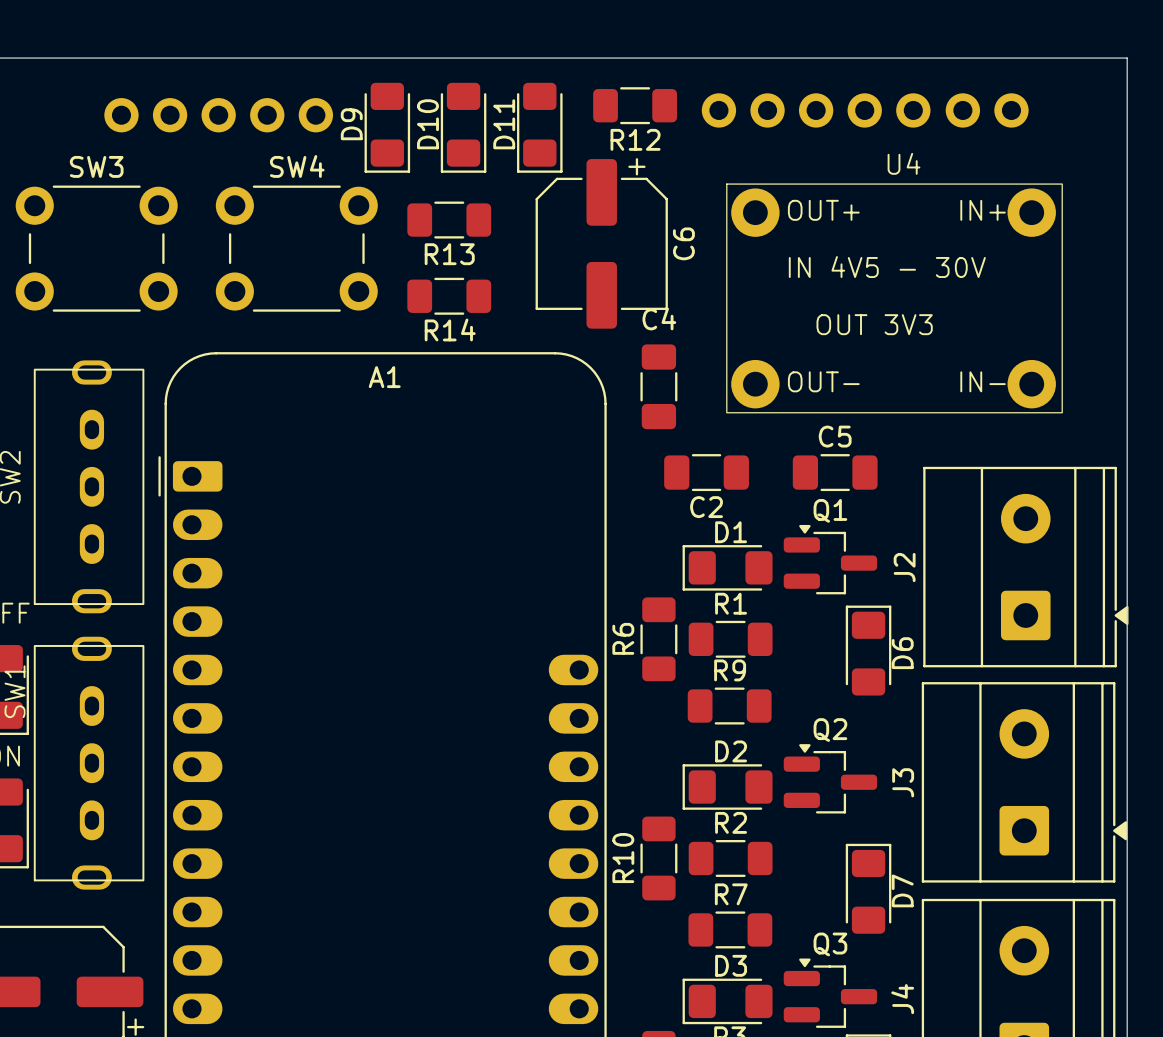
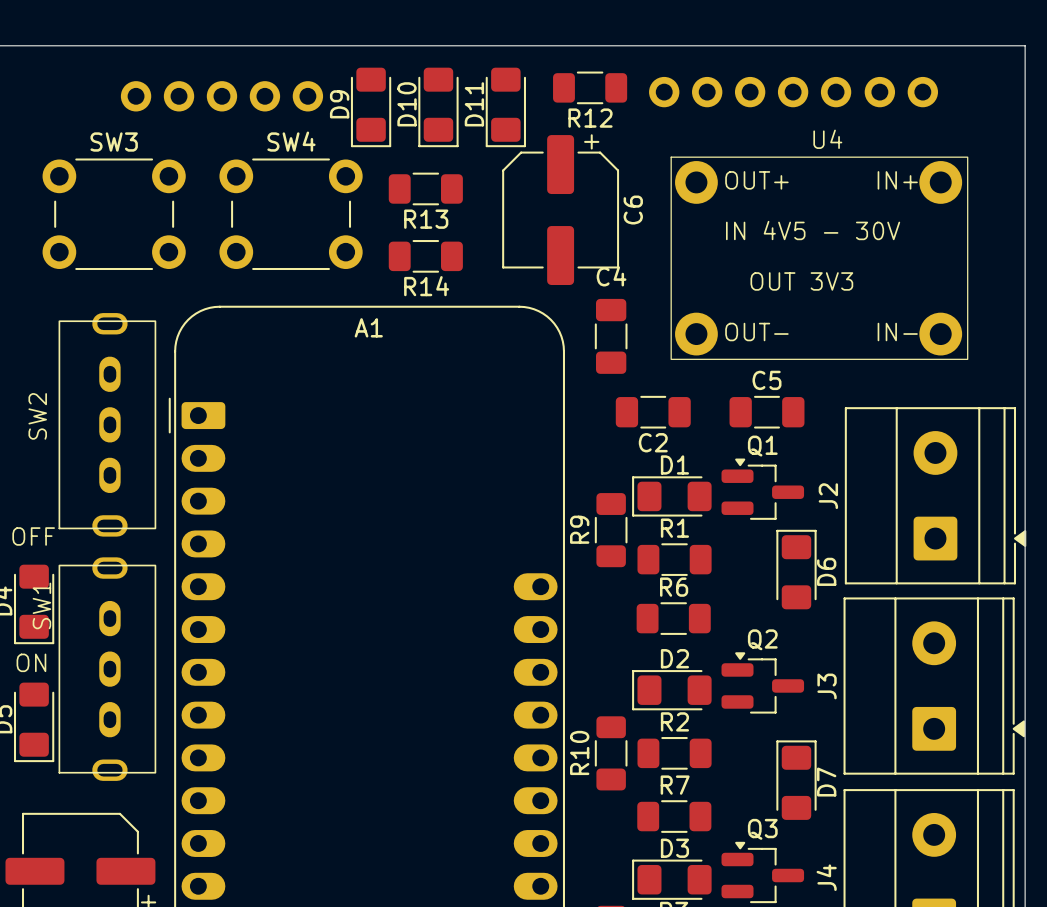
R9: none -> (611, 530)
R6: (658, 639) -> none
R9 name: R9 (730, 670) -> R6 (674, 587)

